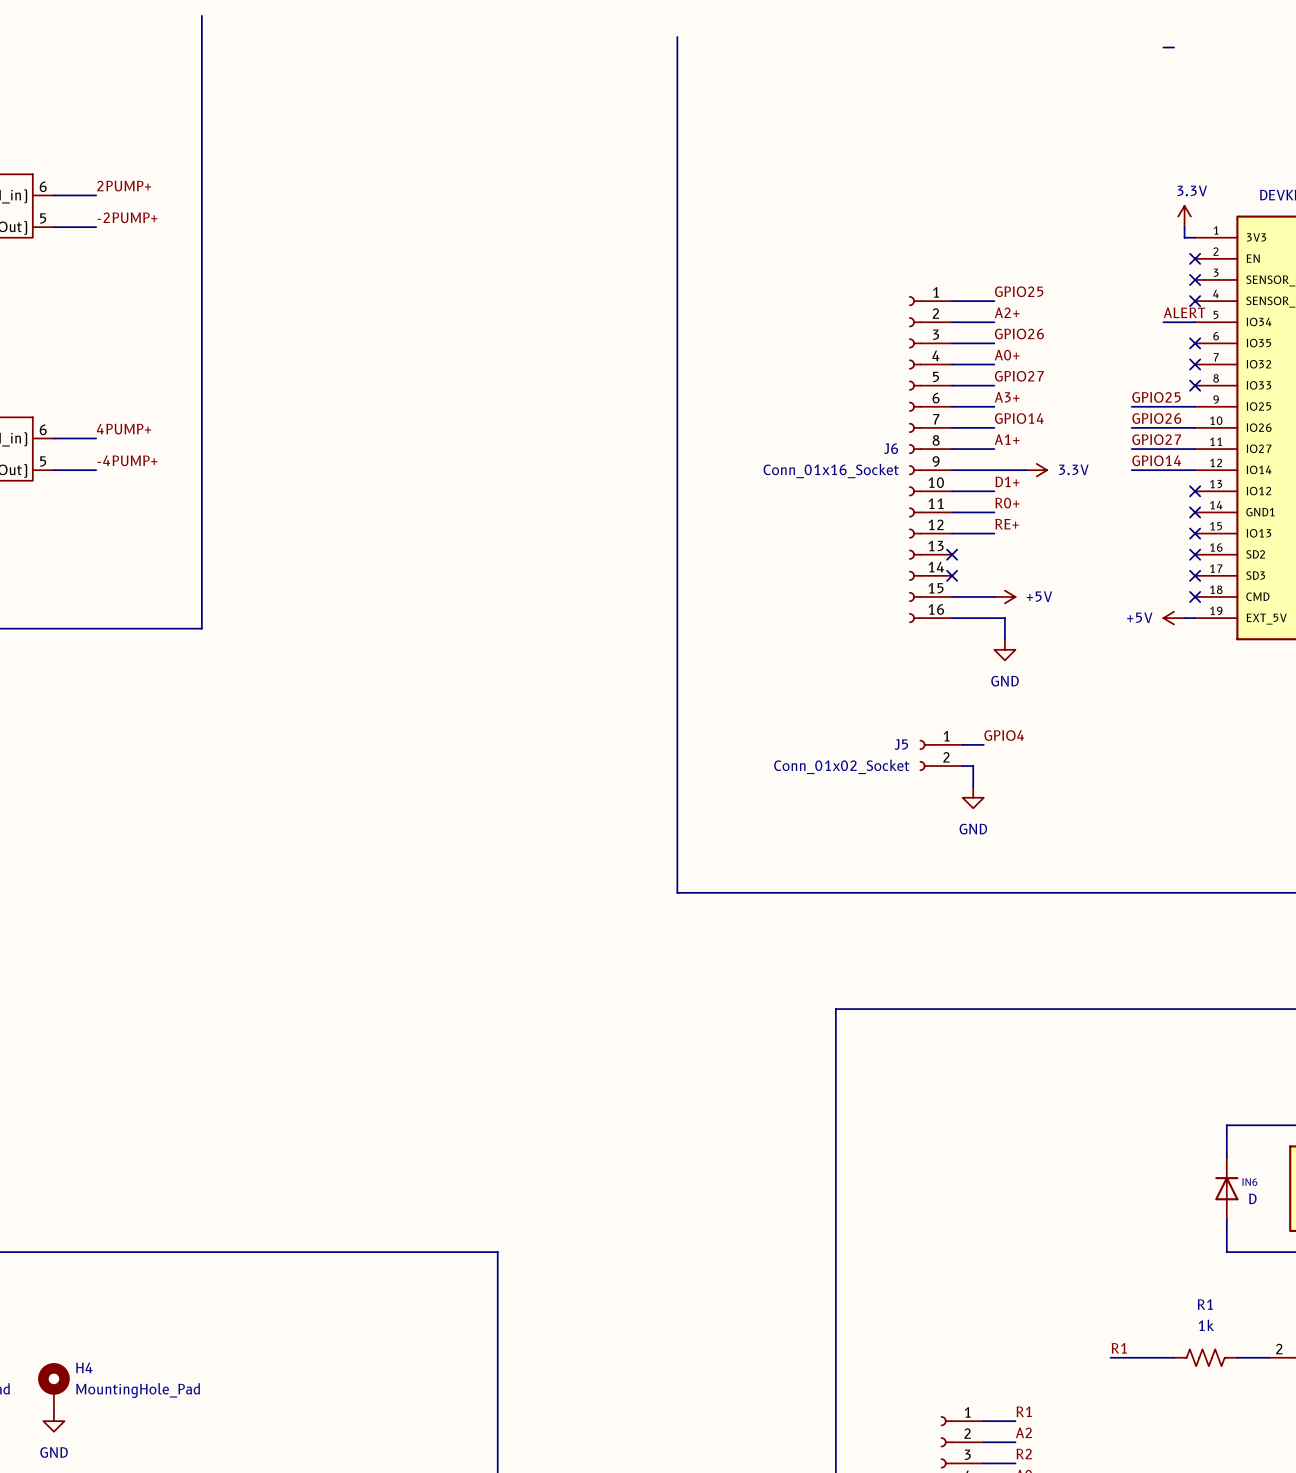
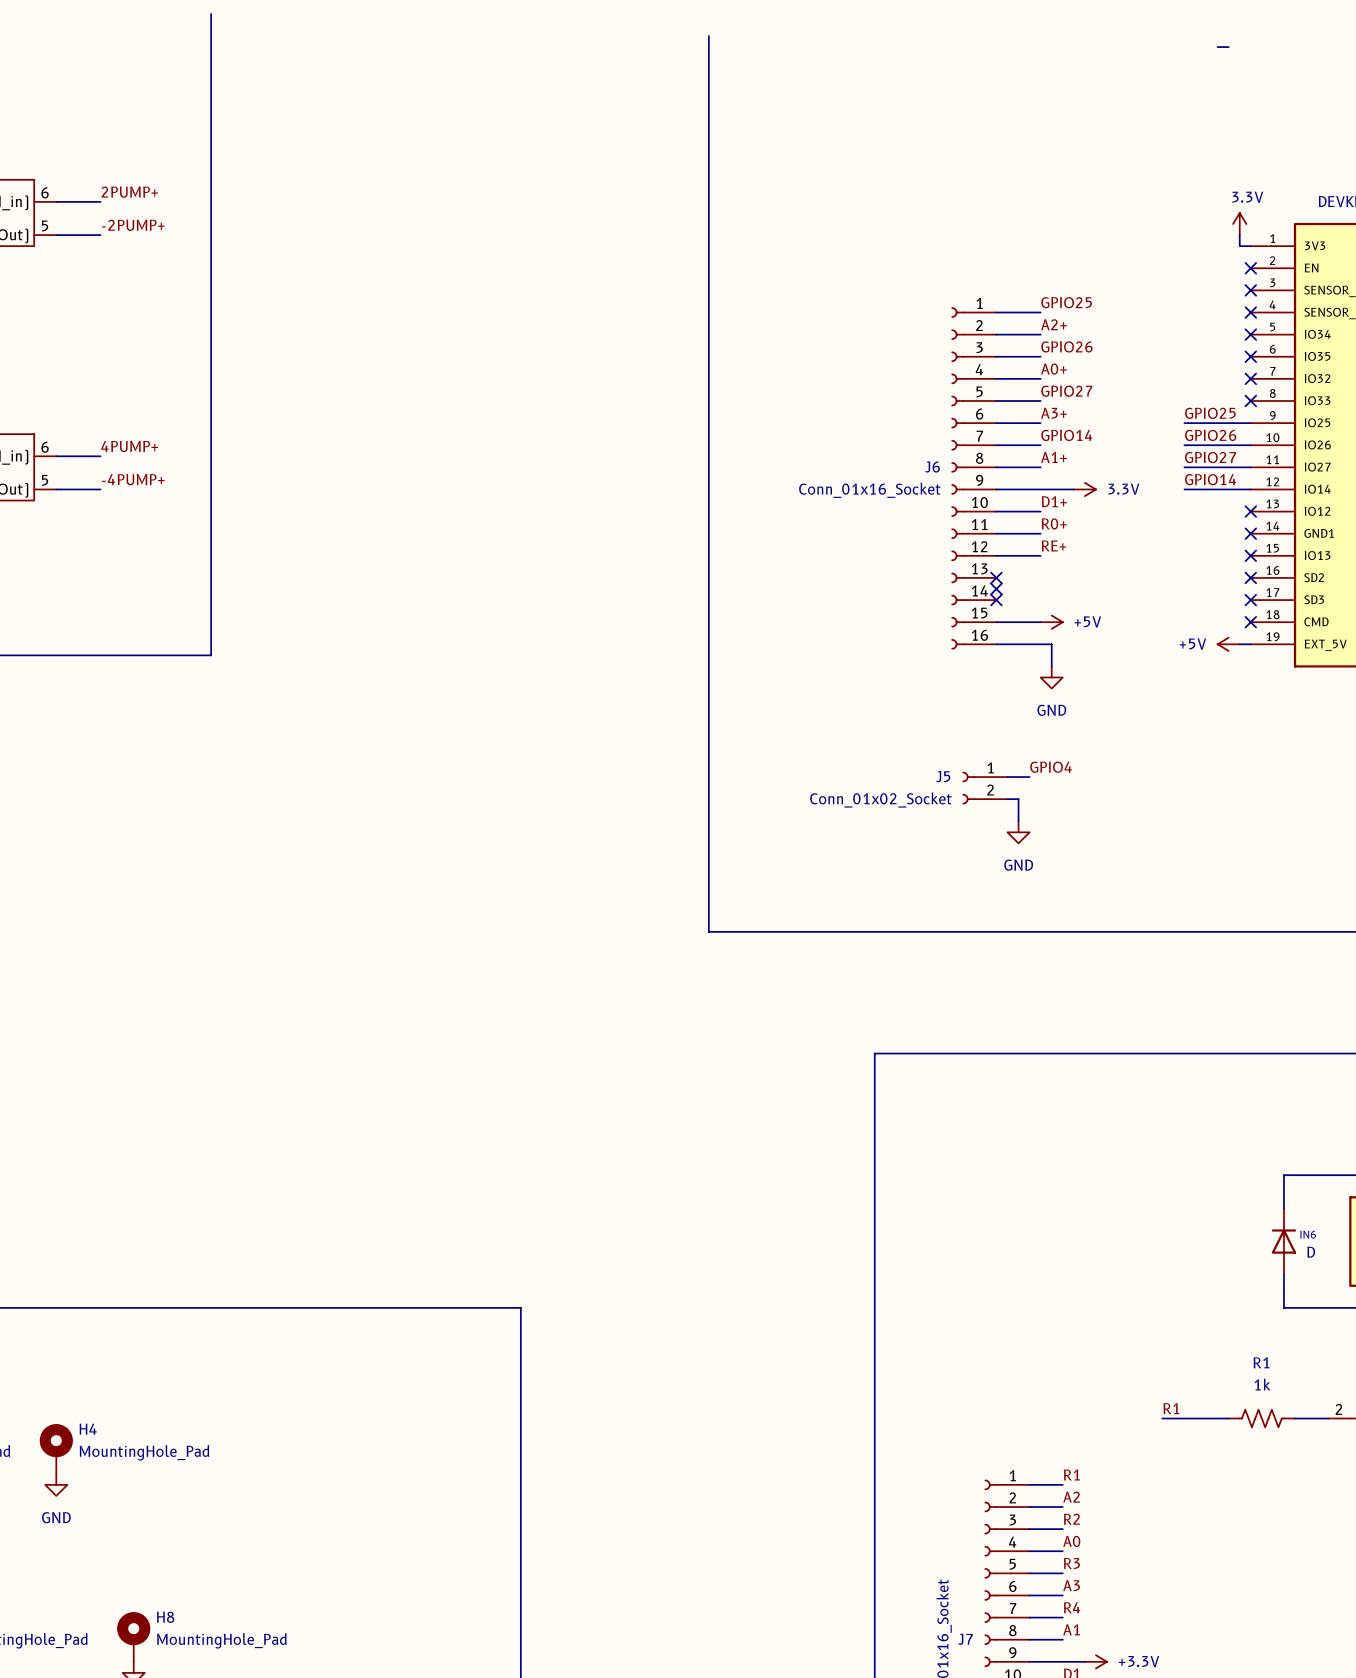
label: ALERT (1184, 312) -> none
wire: (1163, 322) (1195, 322) -> none
no-connect mark: none -> (1250, 334)
no-connect mark: none -> (996, 589)

